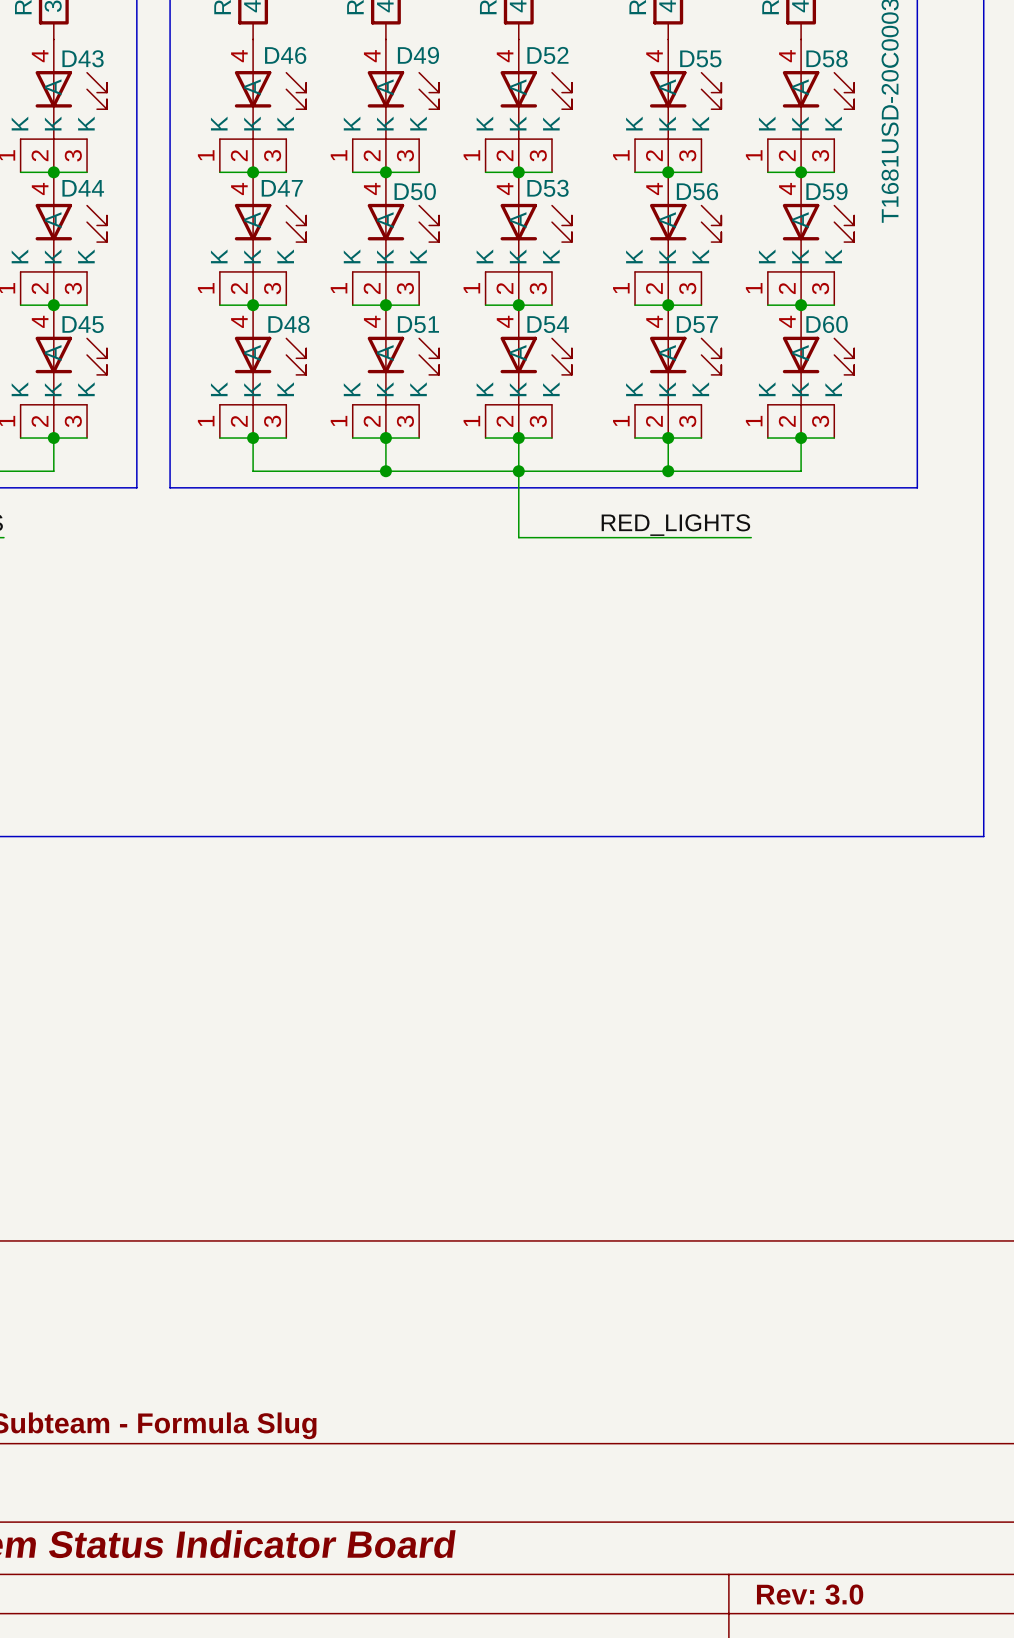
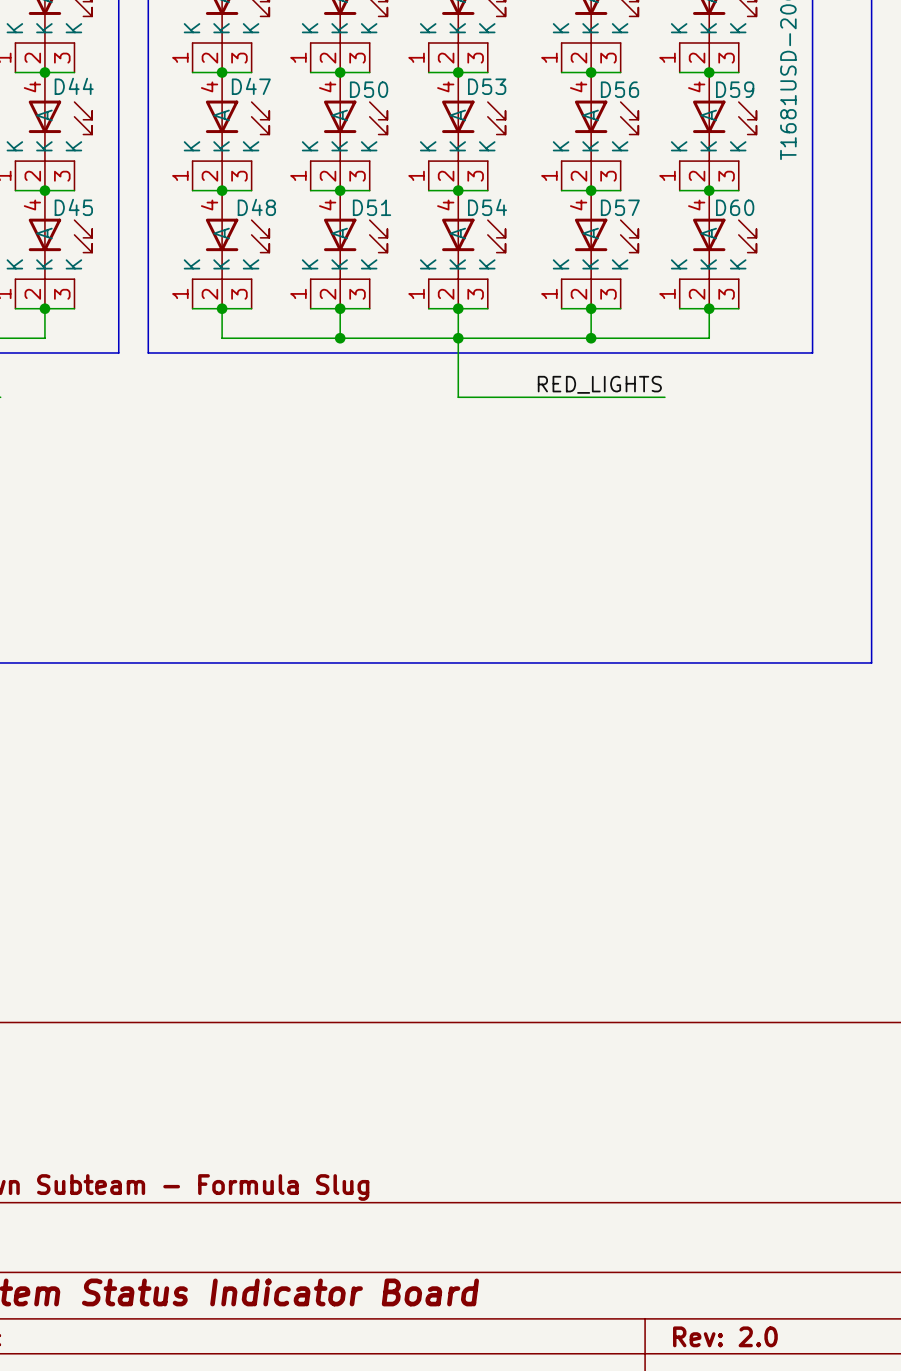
title block: Rev: 3.0 (810, 1594) -> Rev: 2.0 (725, 1336)

